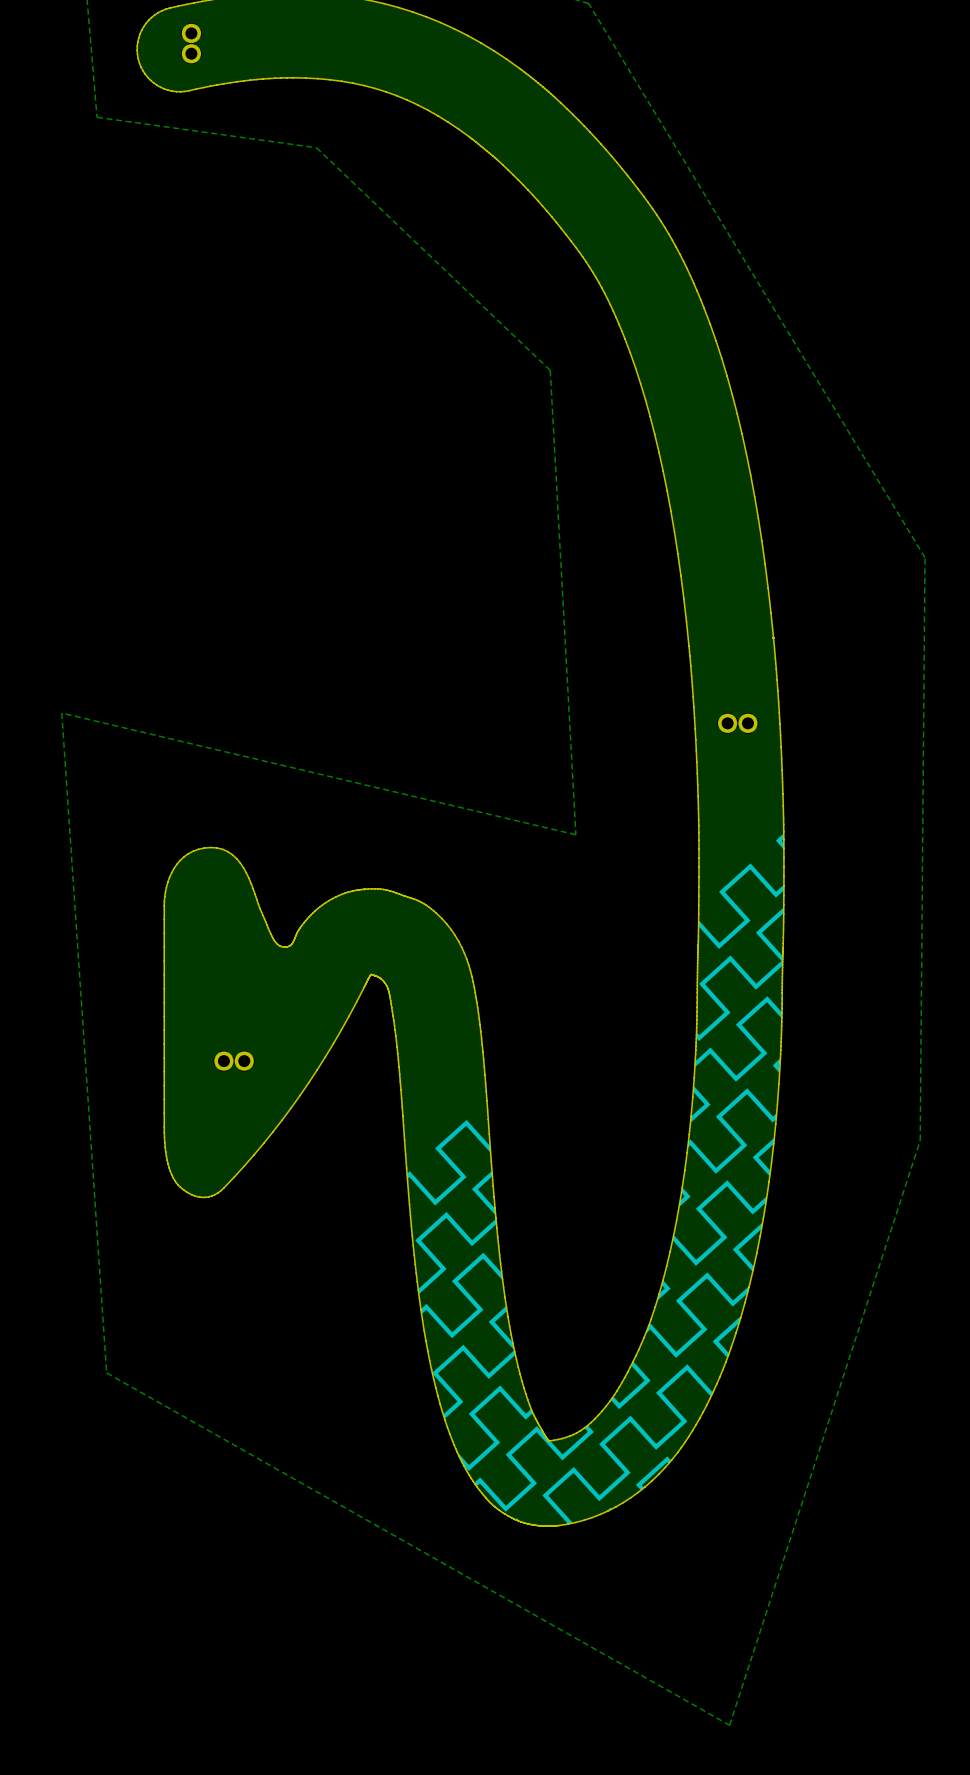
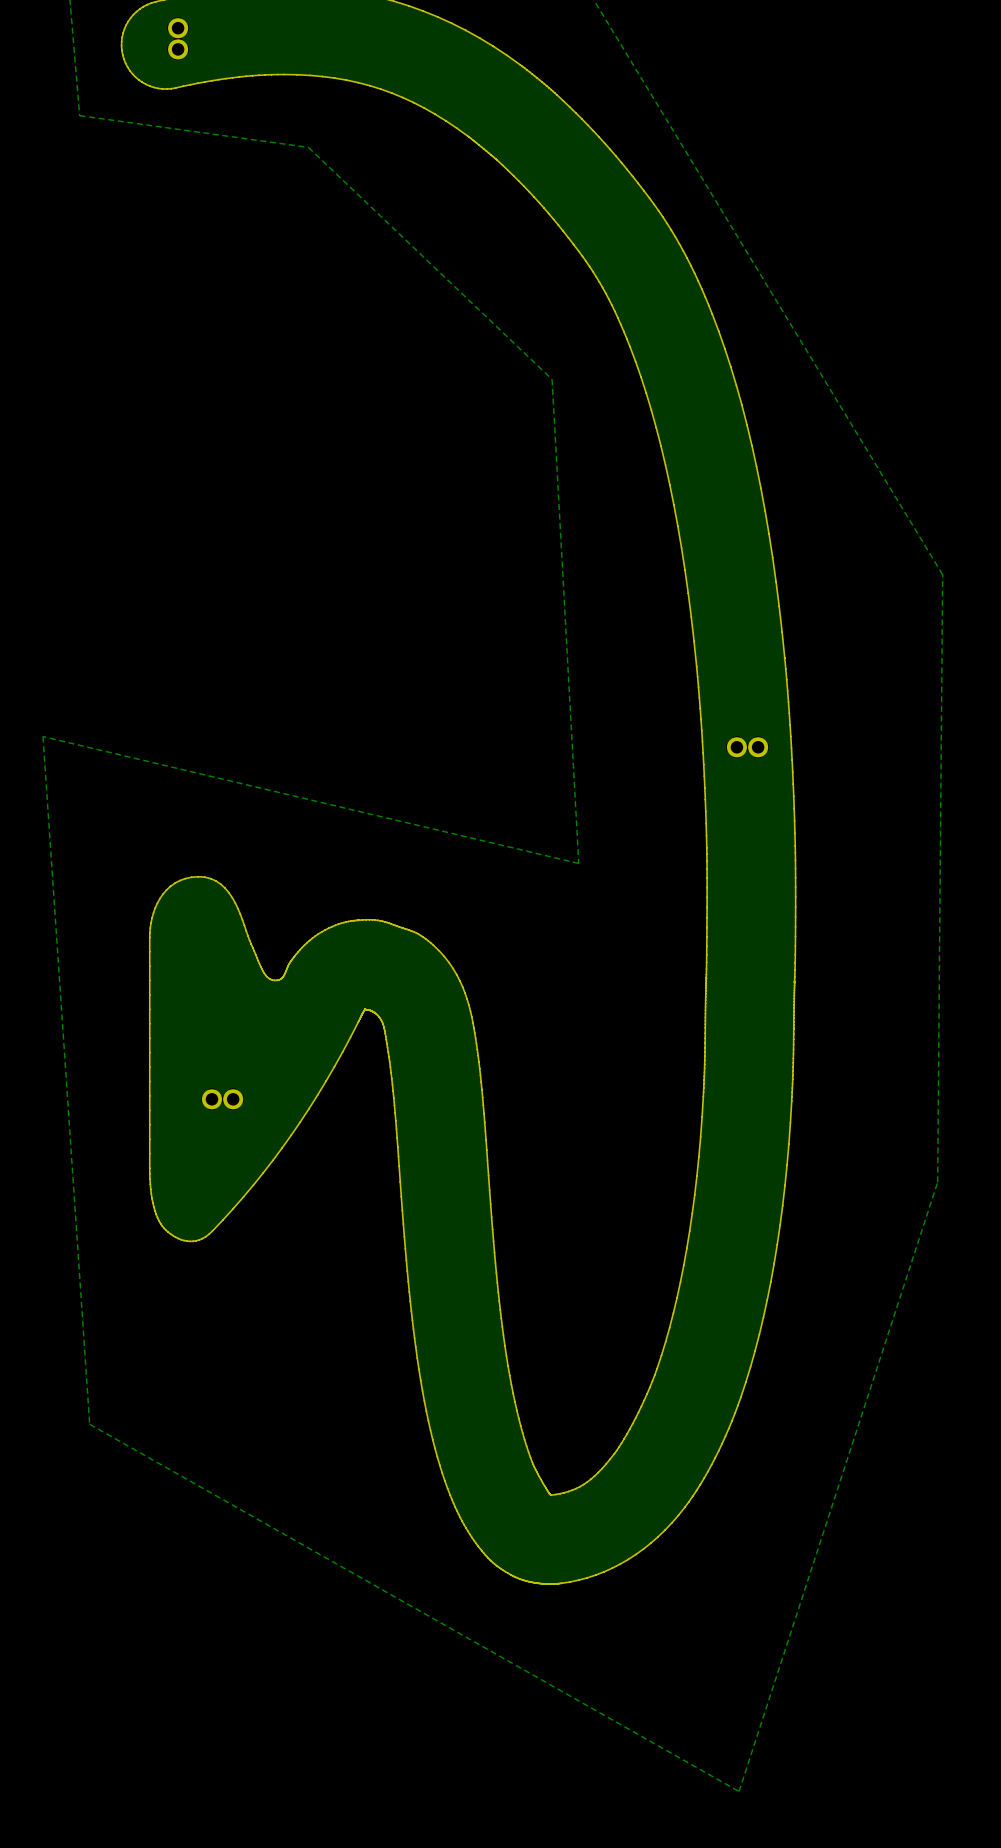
drawing: [407, 833, 785, 1525] -> none

